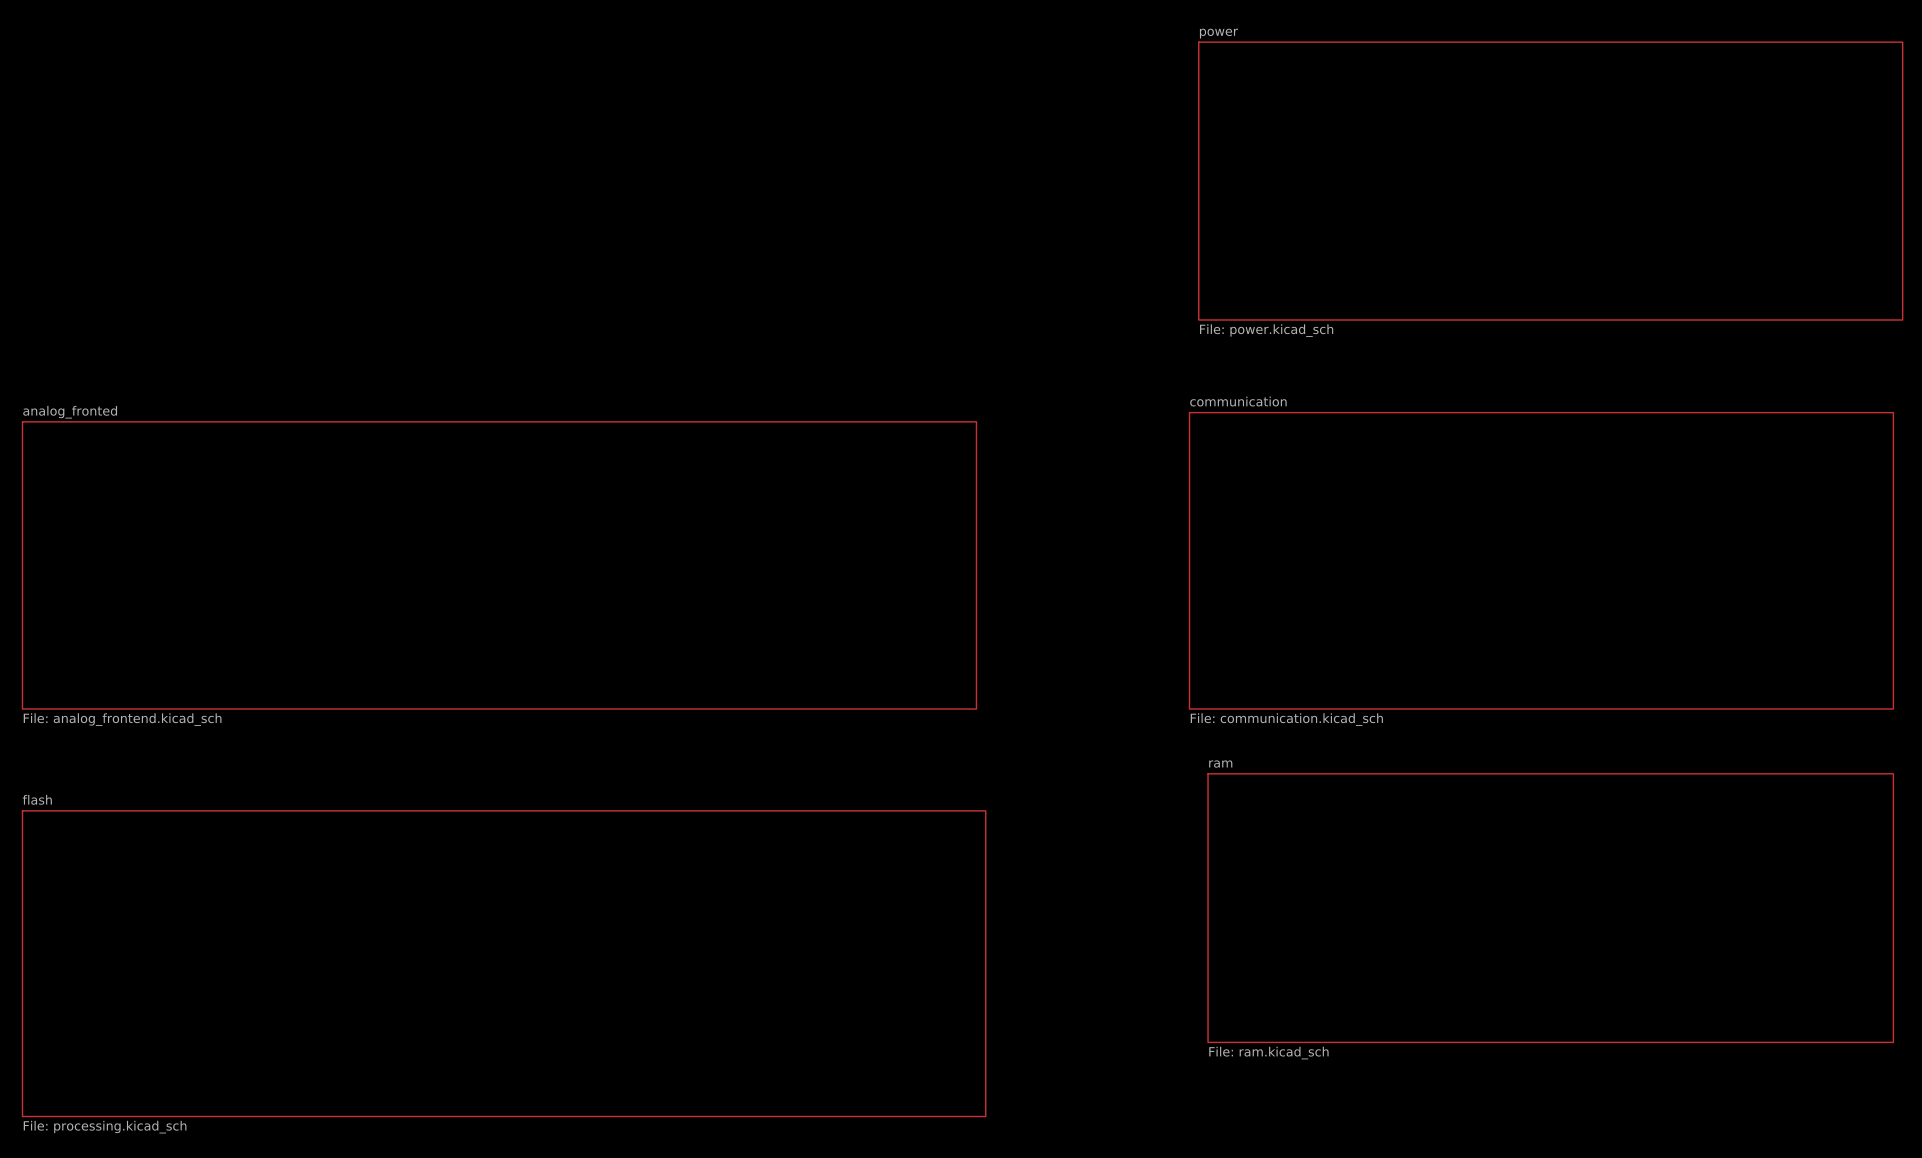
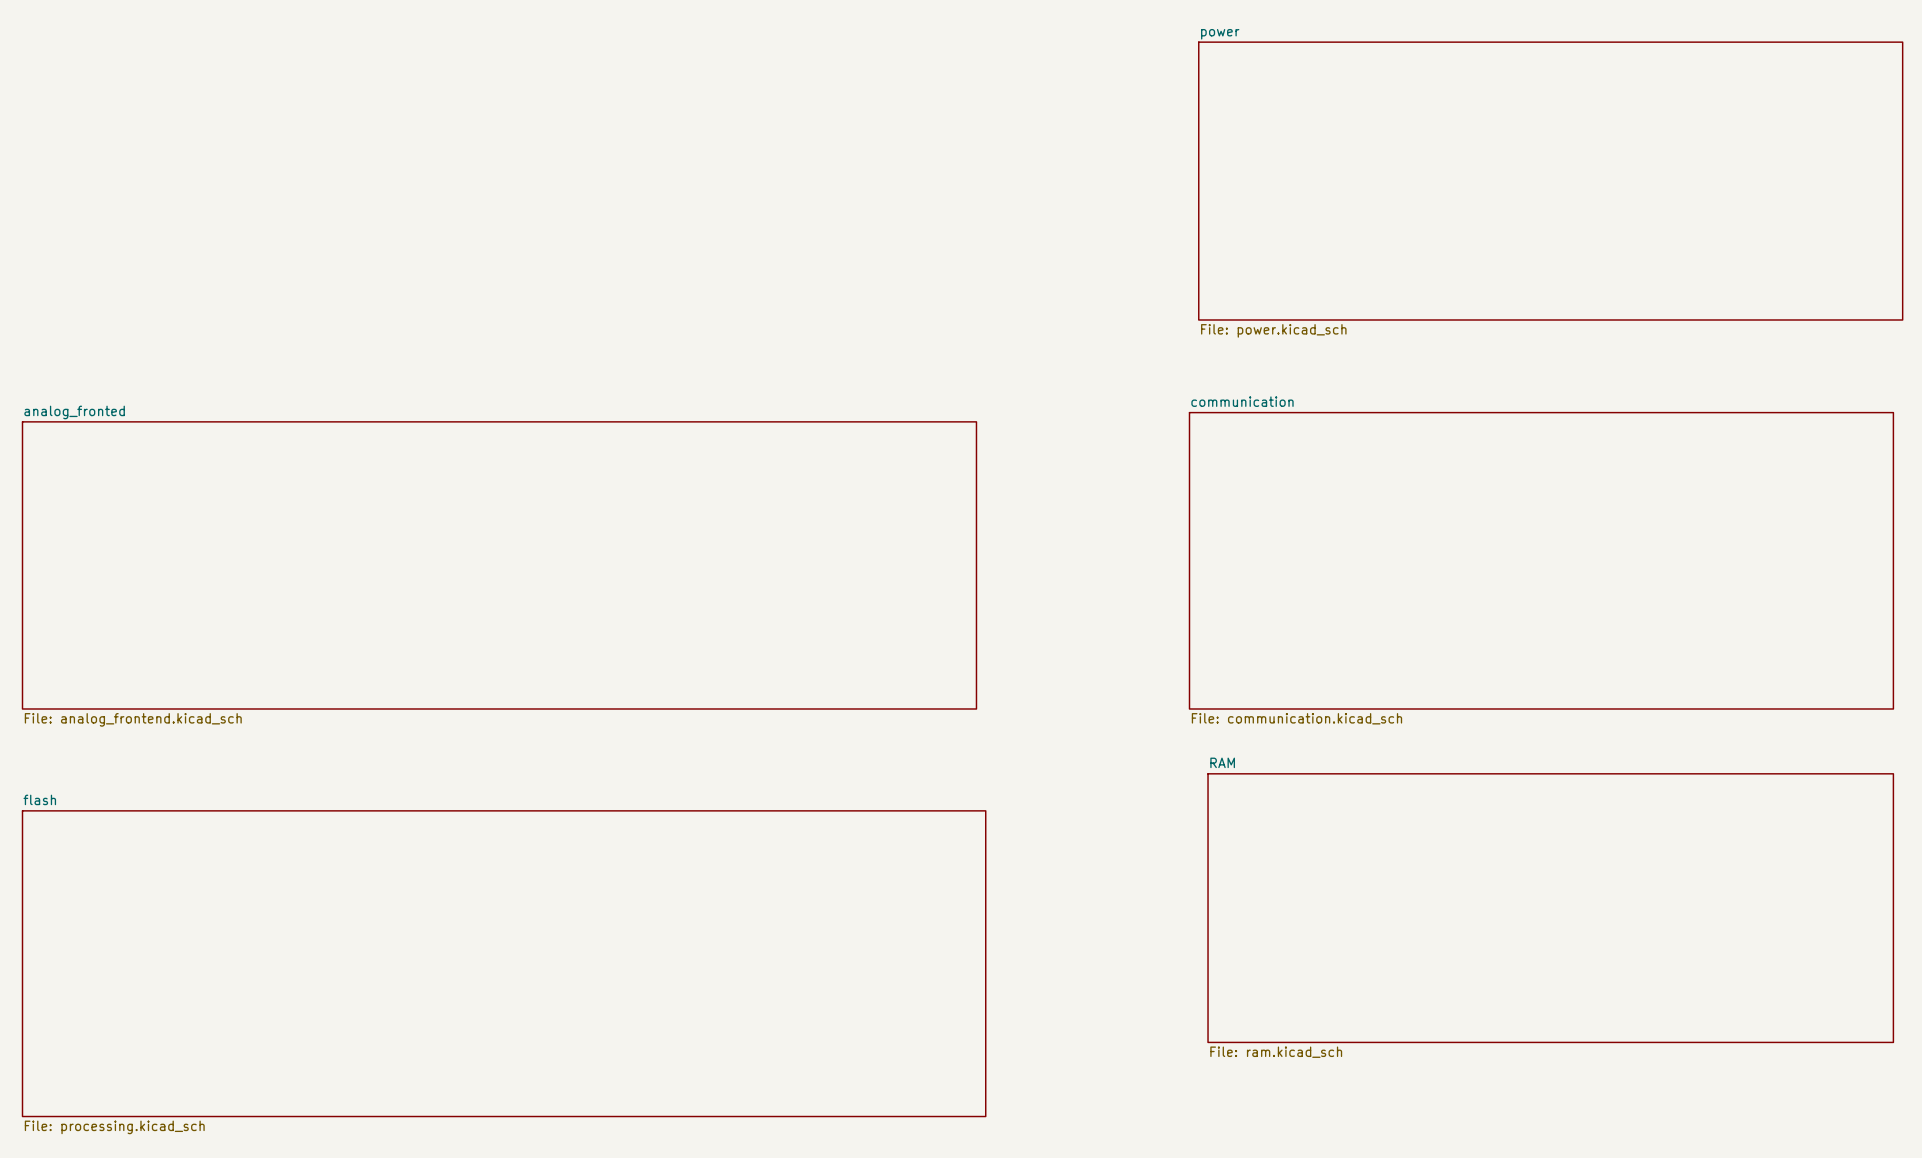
sheet ram name: ram (1220, 764) -> RAM (1222, 762)

